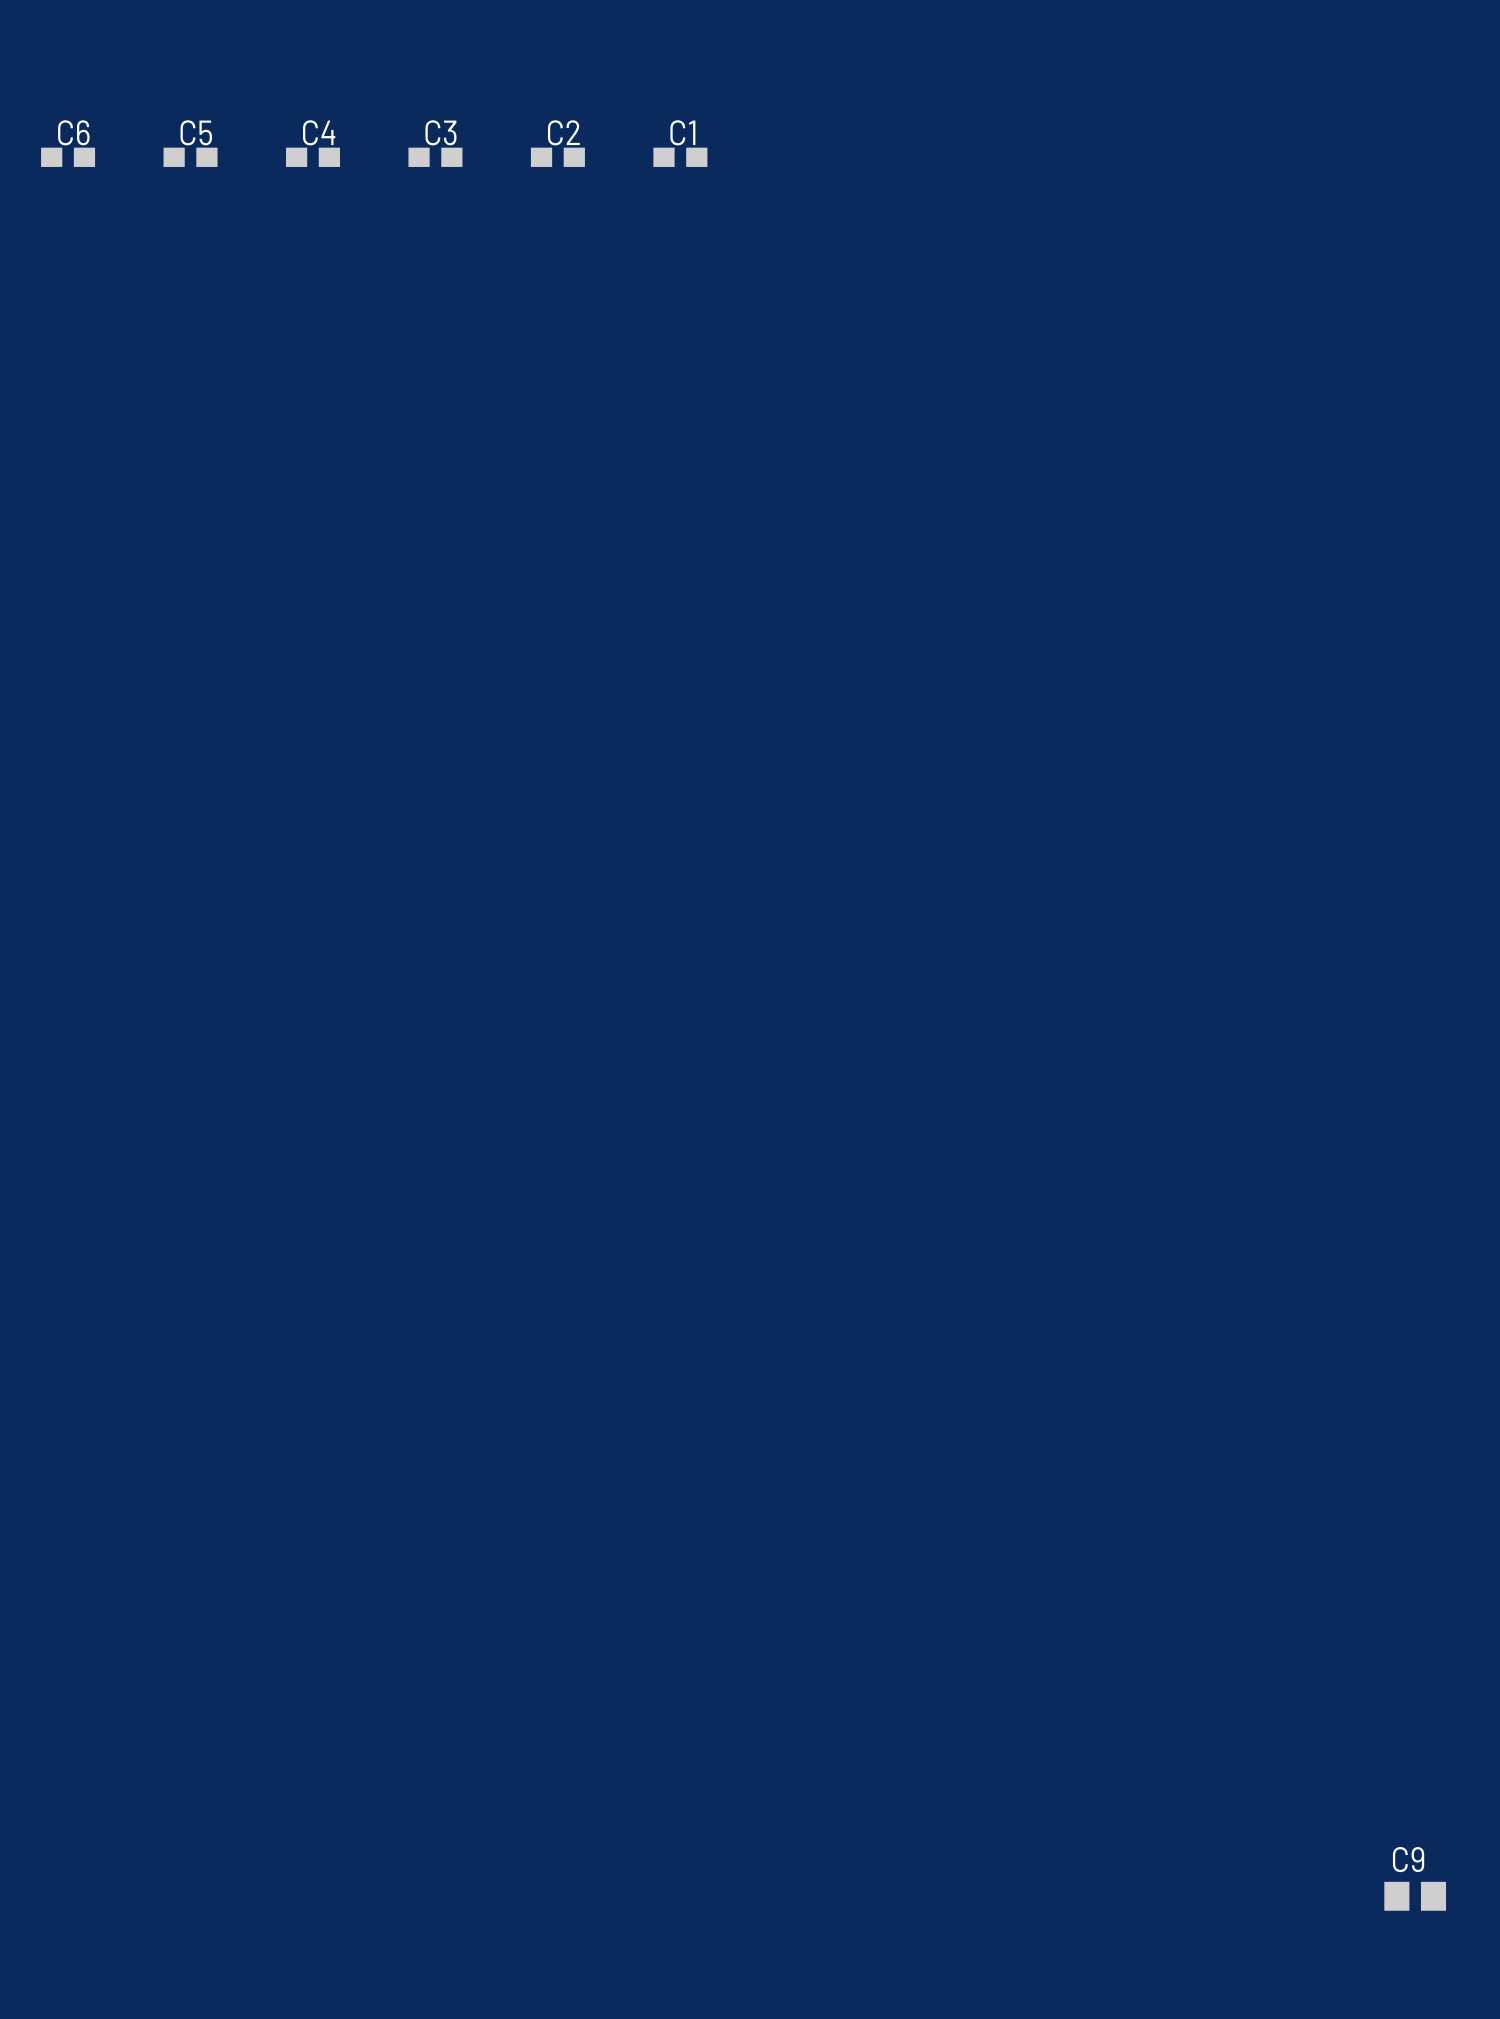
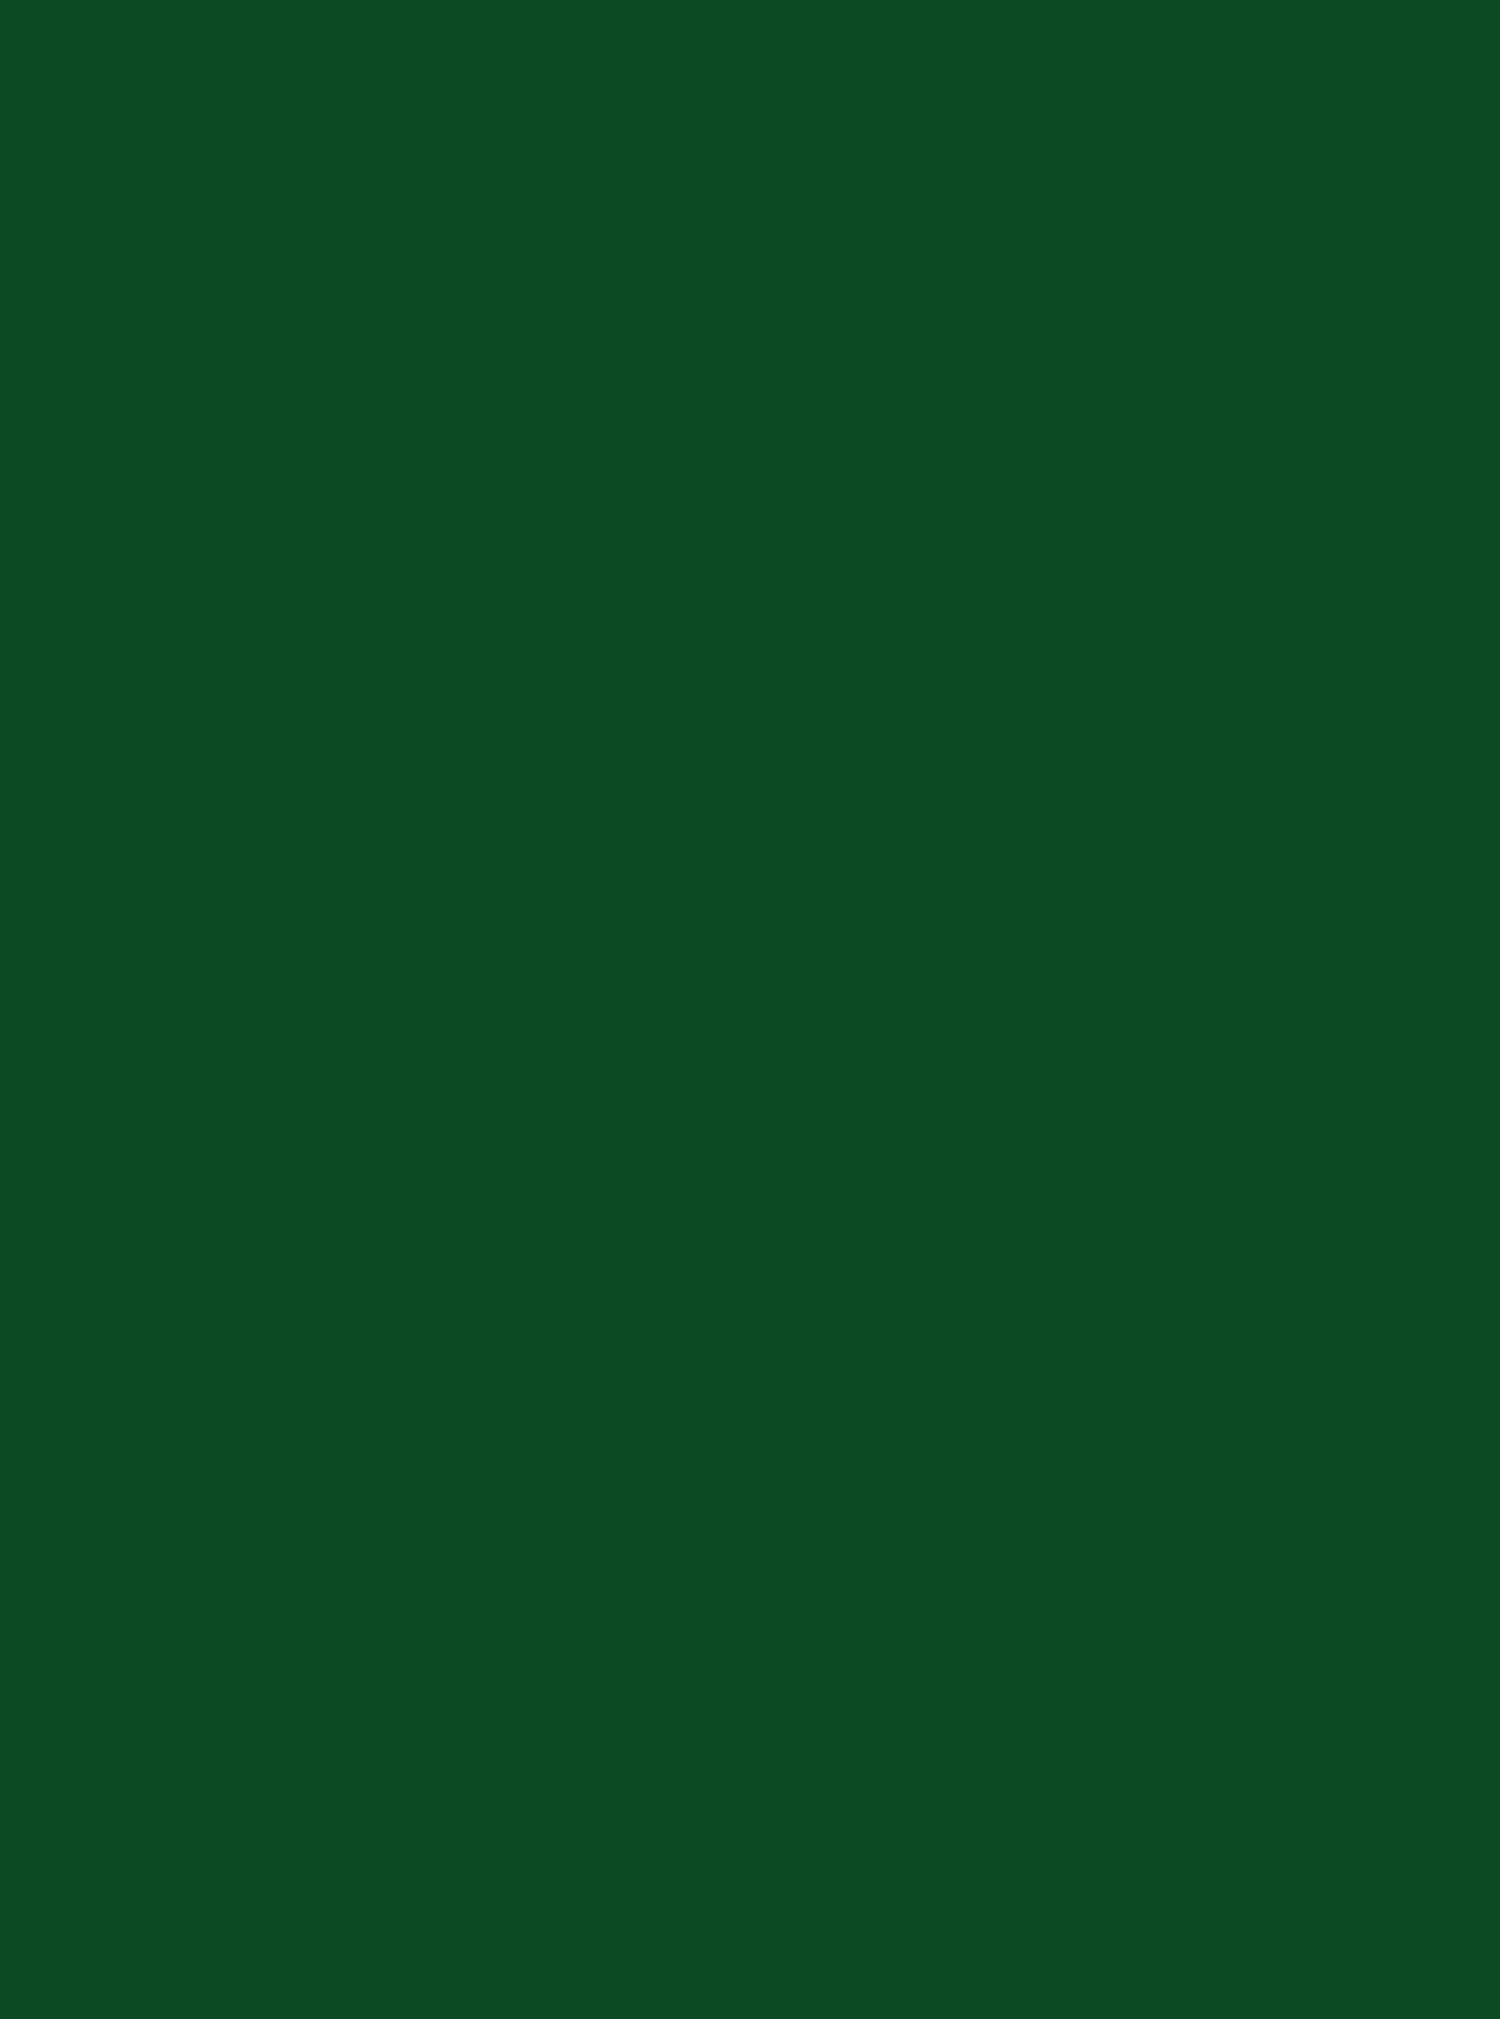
C6: (68, 157) -> none
C5: (190, 157) -> none
C4: (313, 157) -> none
C3: (435, 157) -> none
C2: (557, 157) -> none
C1: (680, 157) -> none
C9: (1415, 1896) -> none

